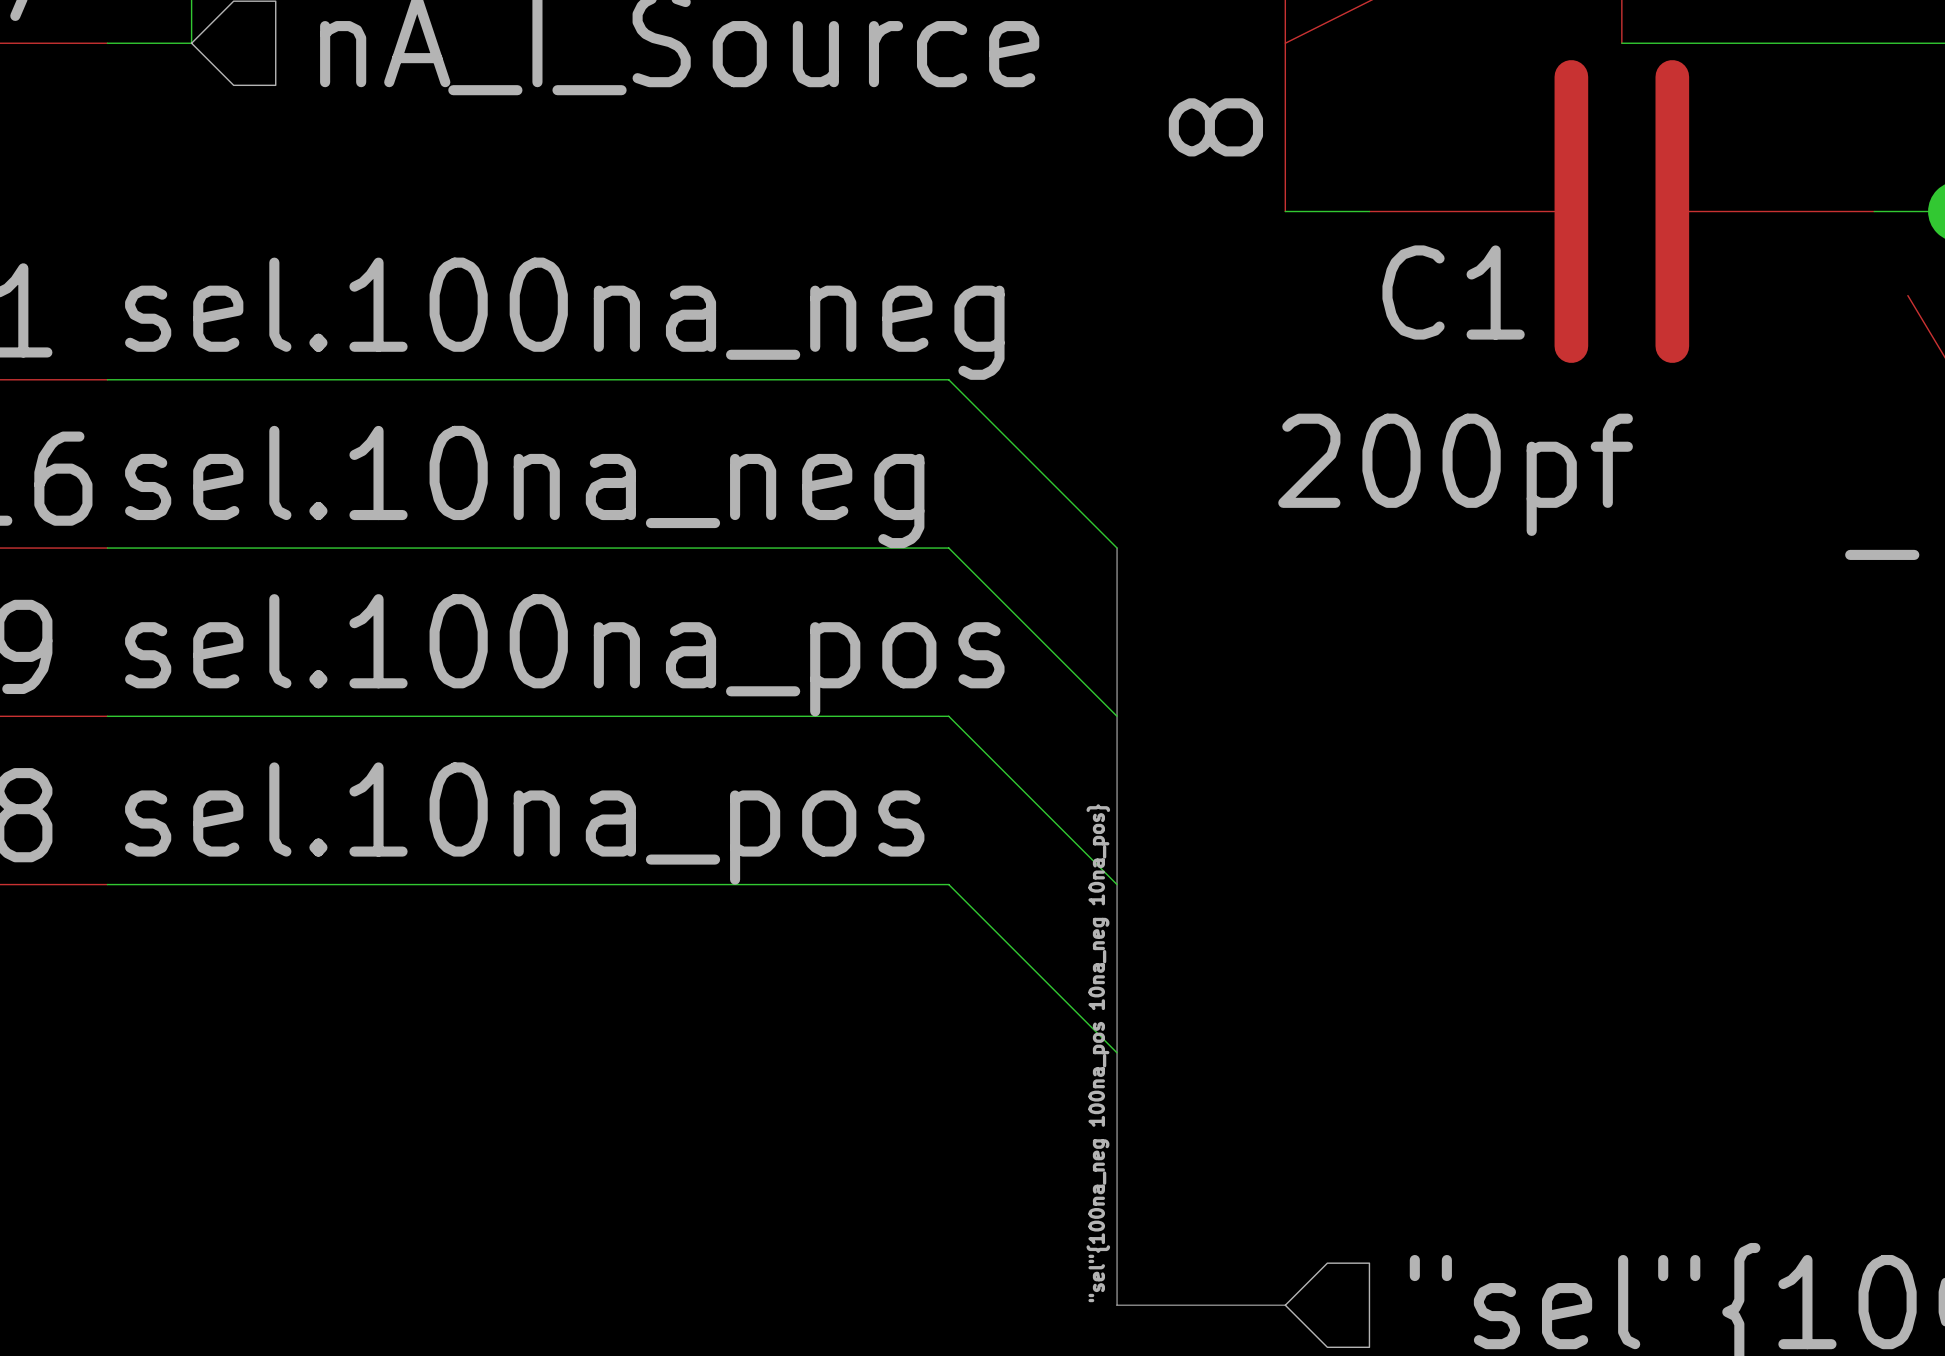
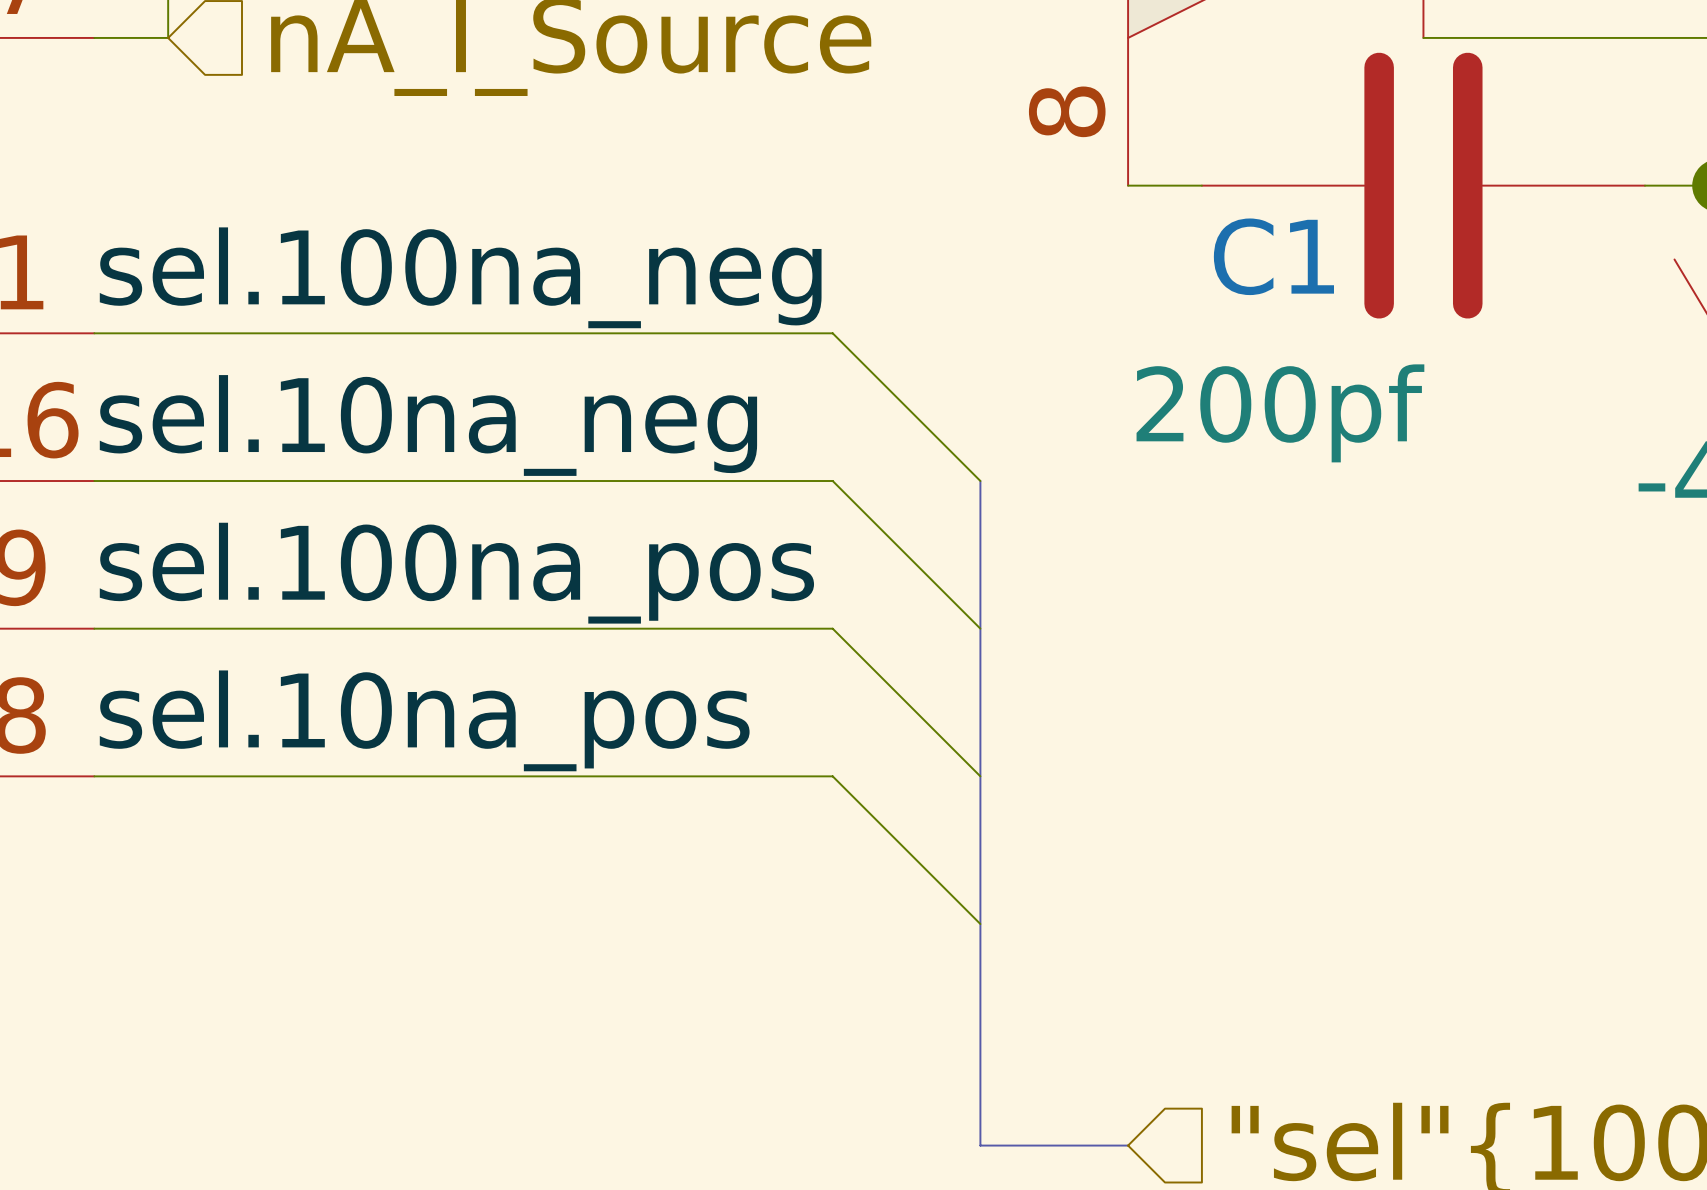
label: "sel"{100na_neg 100na_pos 10na_neg 10na_pos} (1098, 1053) -> none

